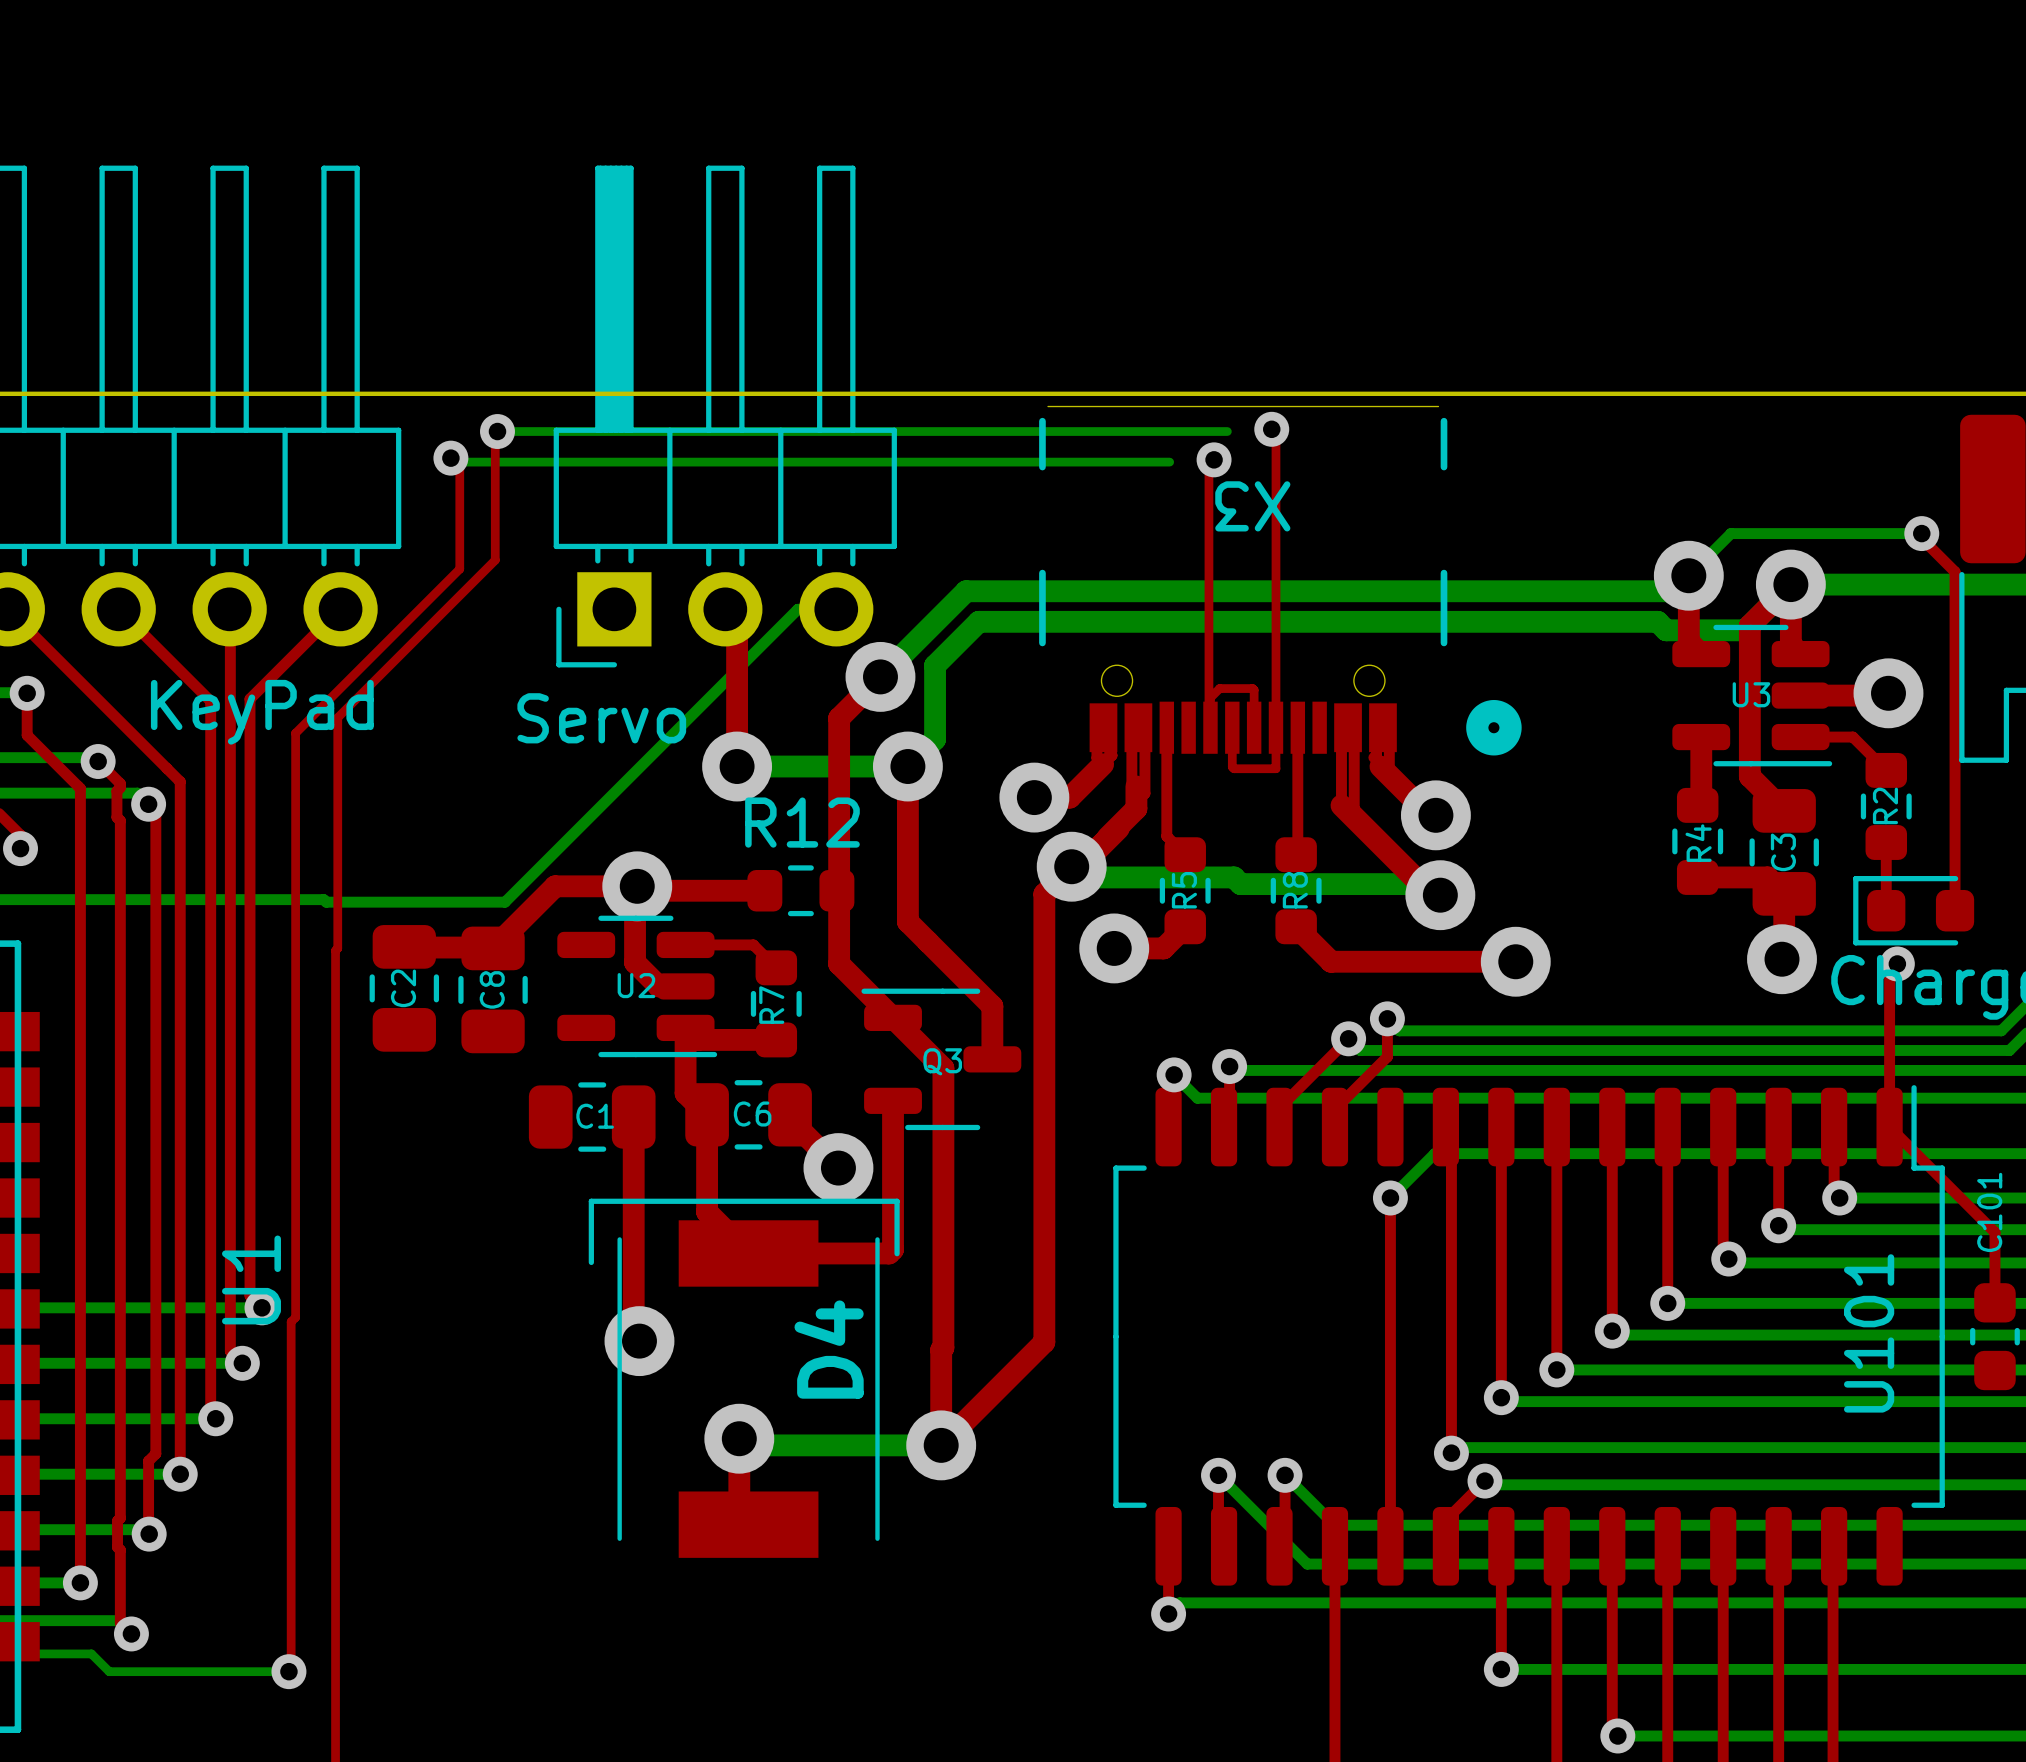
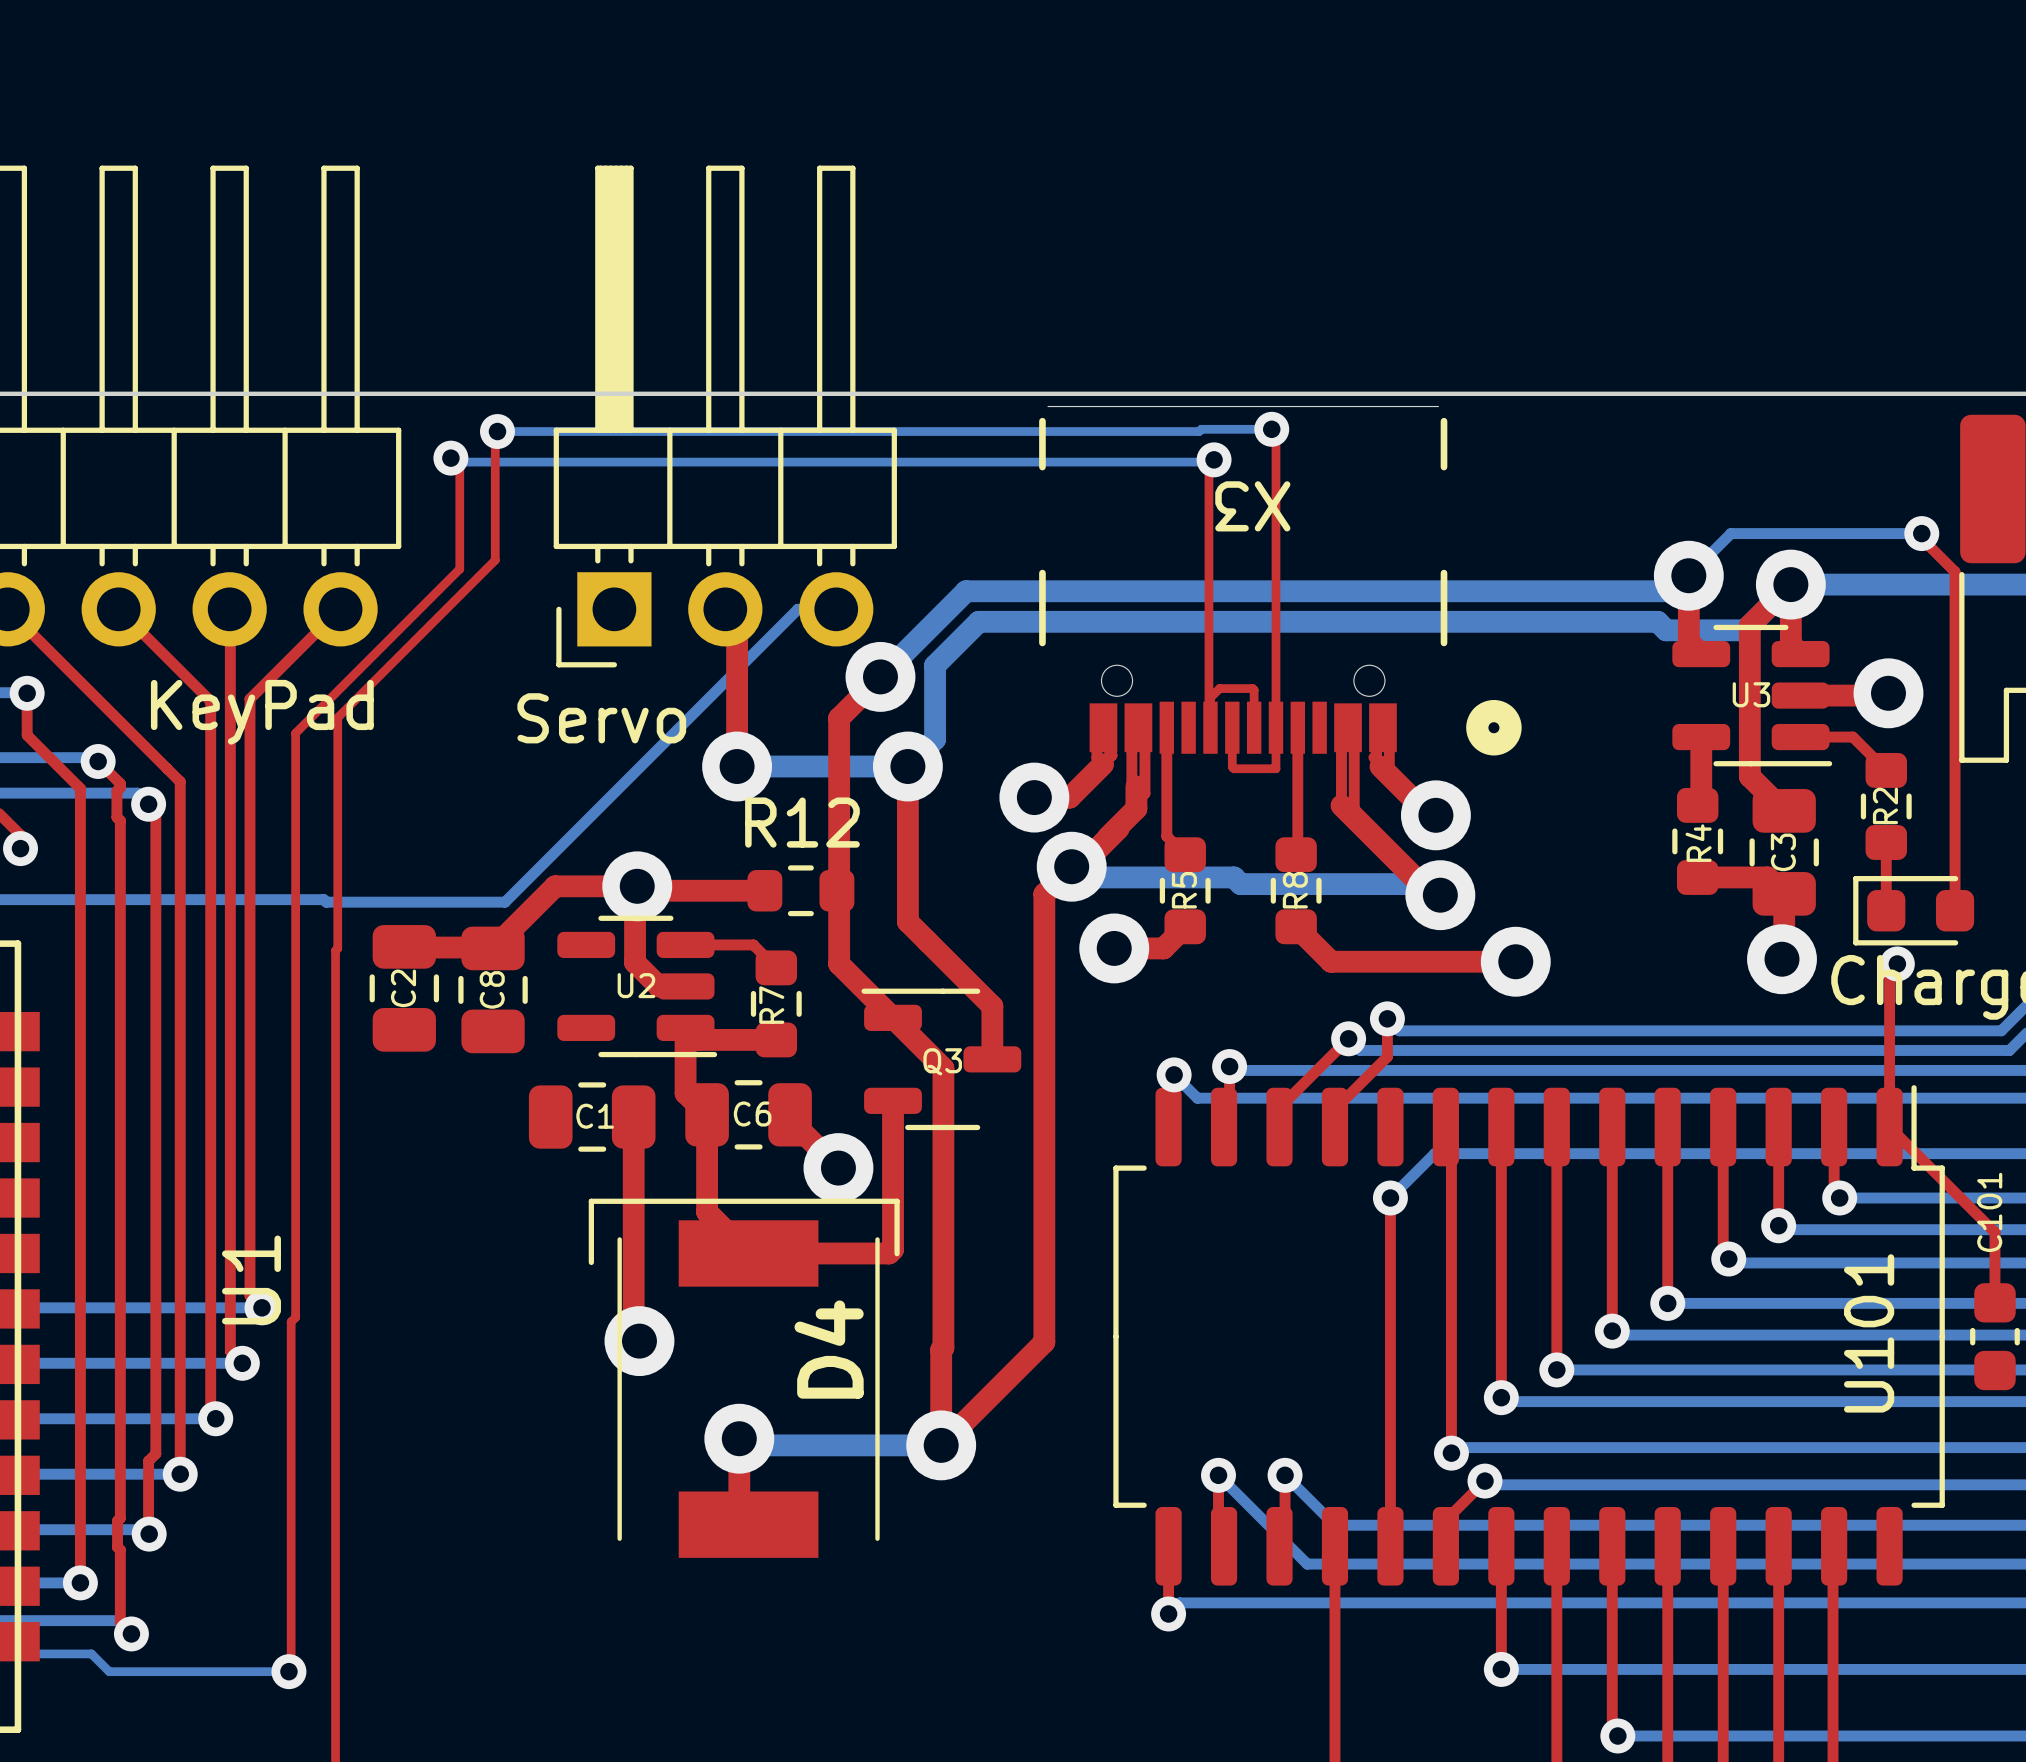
bottom track: (1199, 431) (1227, 431) -> (1199, 431) (1201, 429) (1271, 429)
bottom track: none -> (1214, 459) (1211, 462) (1169, 462)

